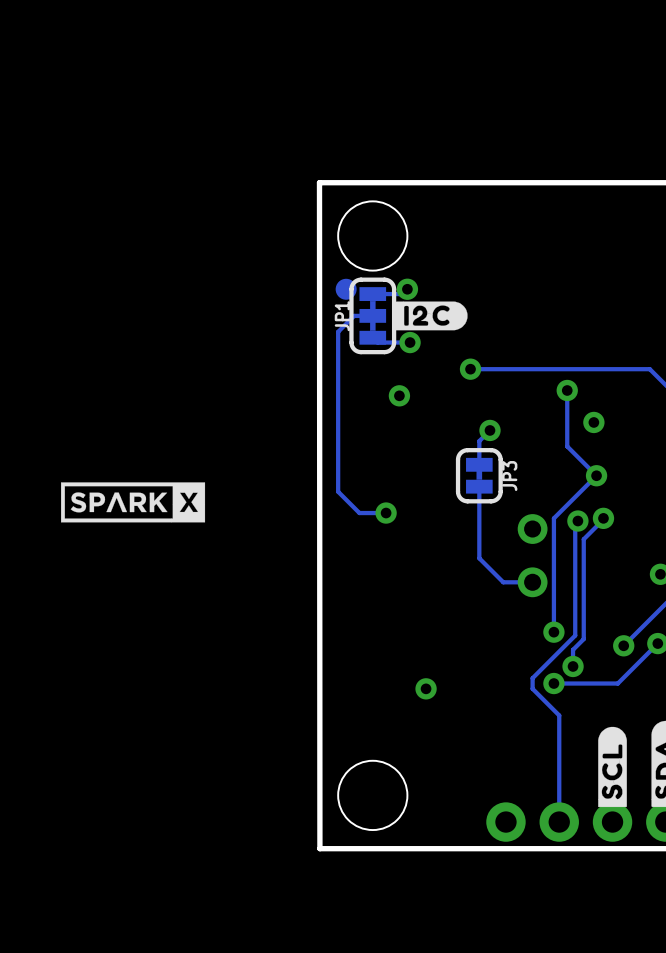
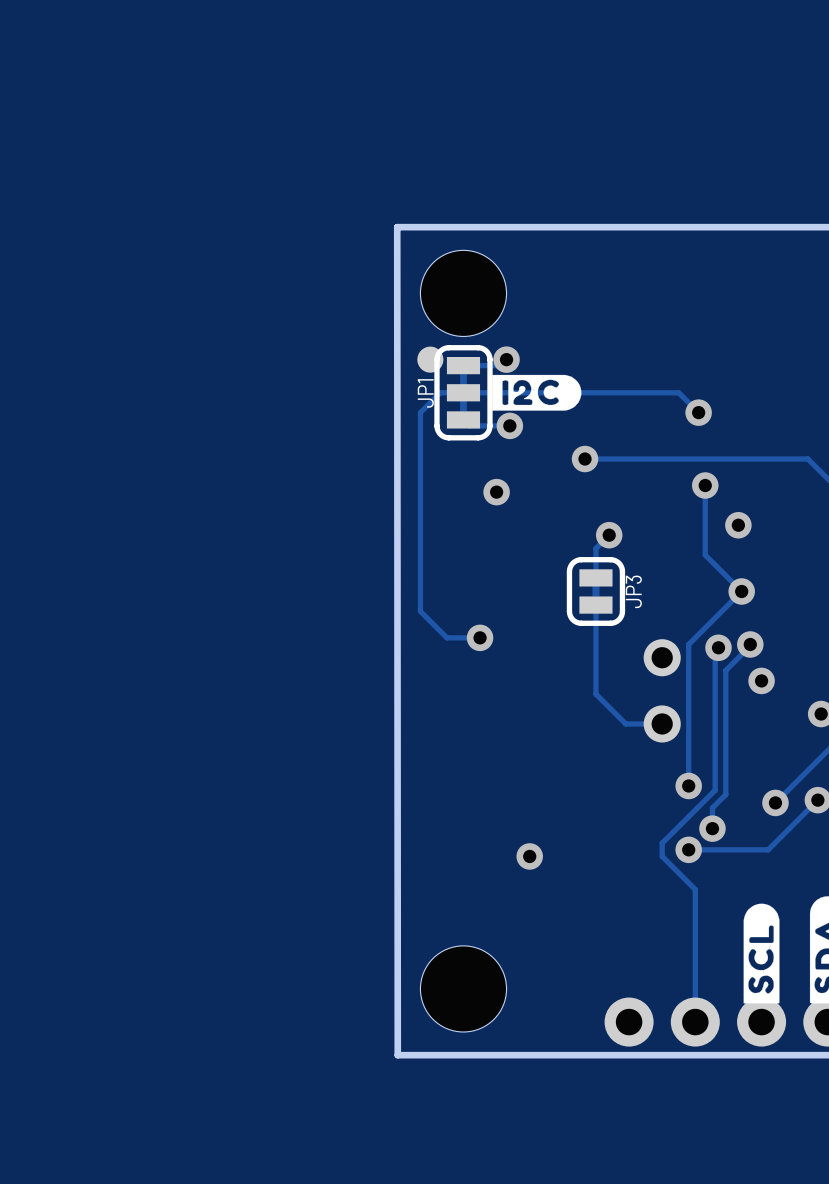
track: none -> (463, 392) (678, 392) (698, 412)
via: none -> (698, 412)
drawing: [61, 482, 206, 523] -> none
via: none -> (761, 680)

